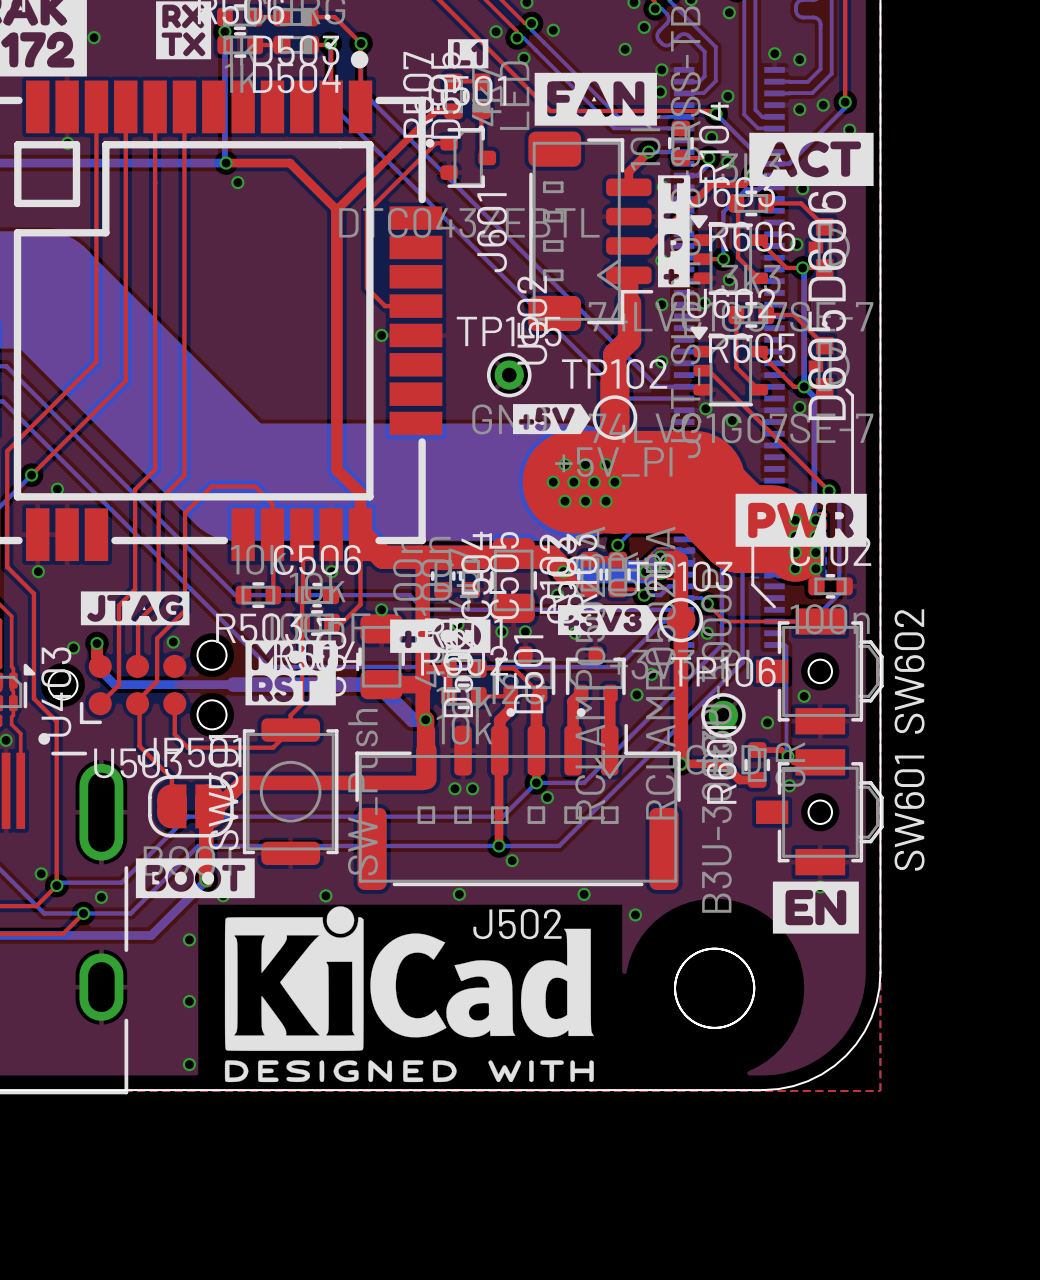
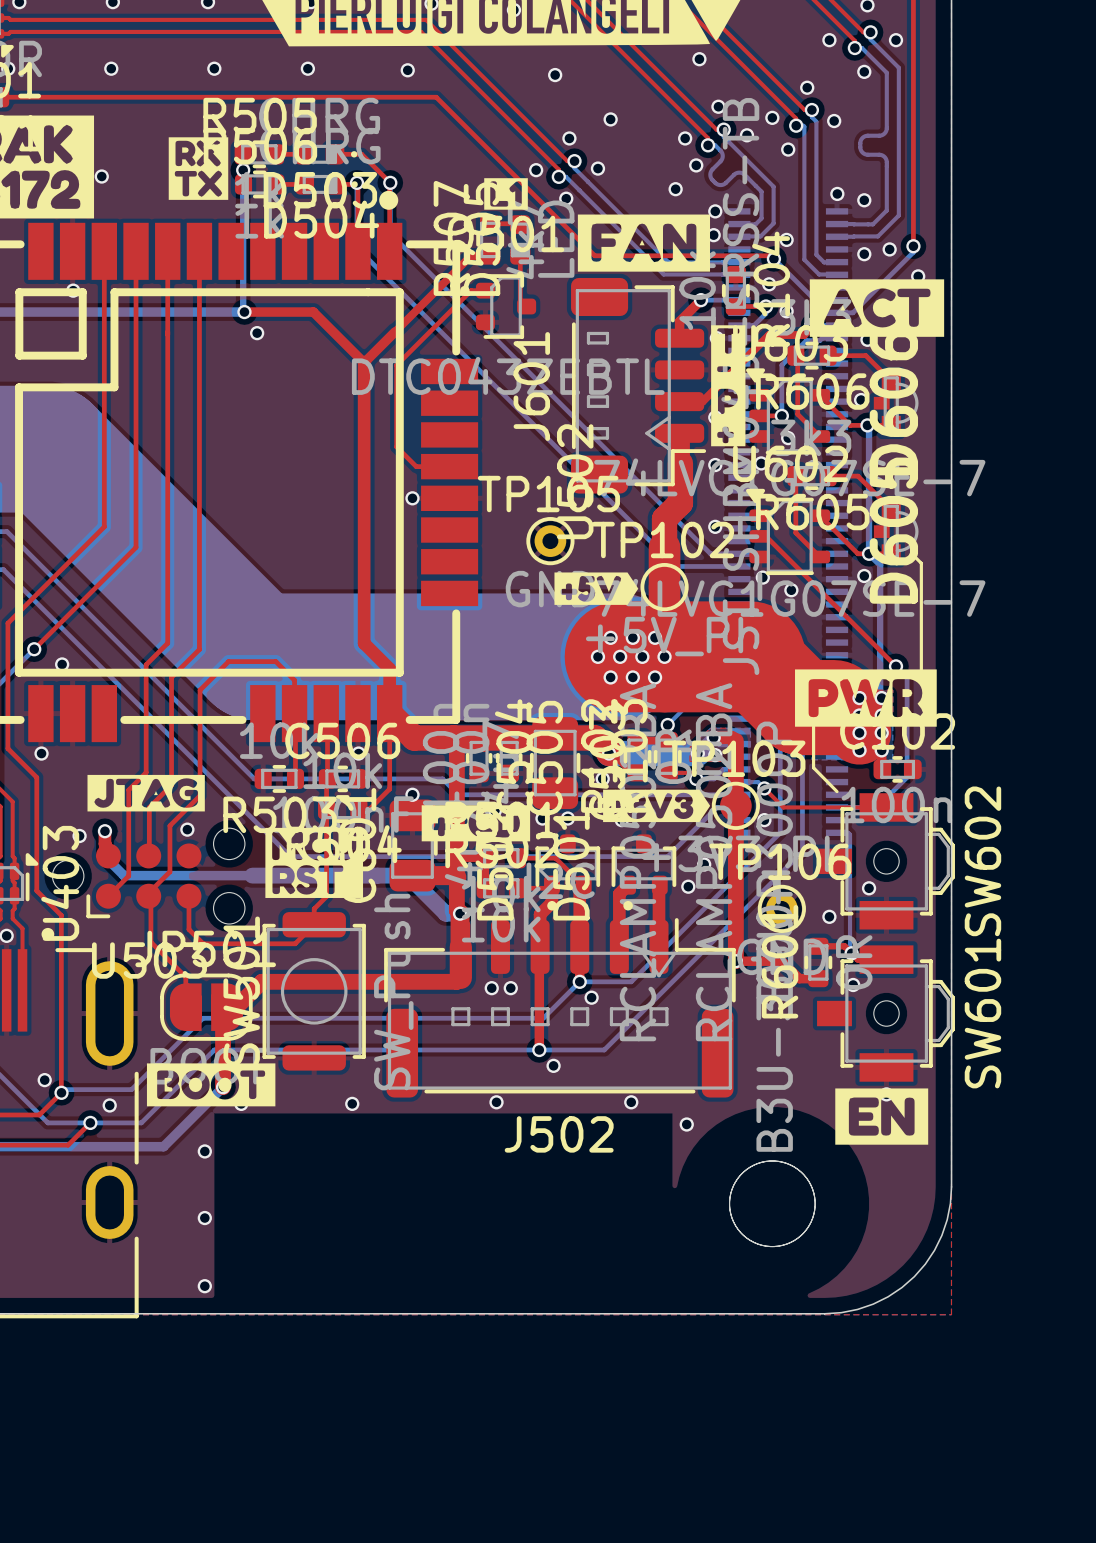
drawing: [224, 906, 594, 1083] -> none

